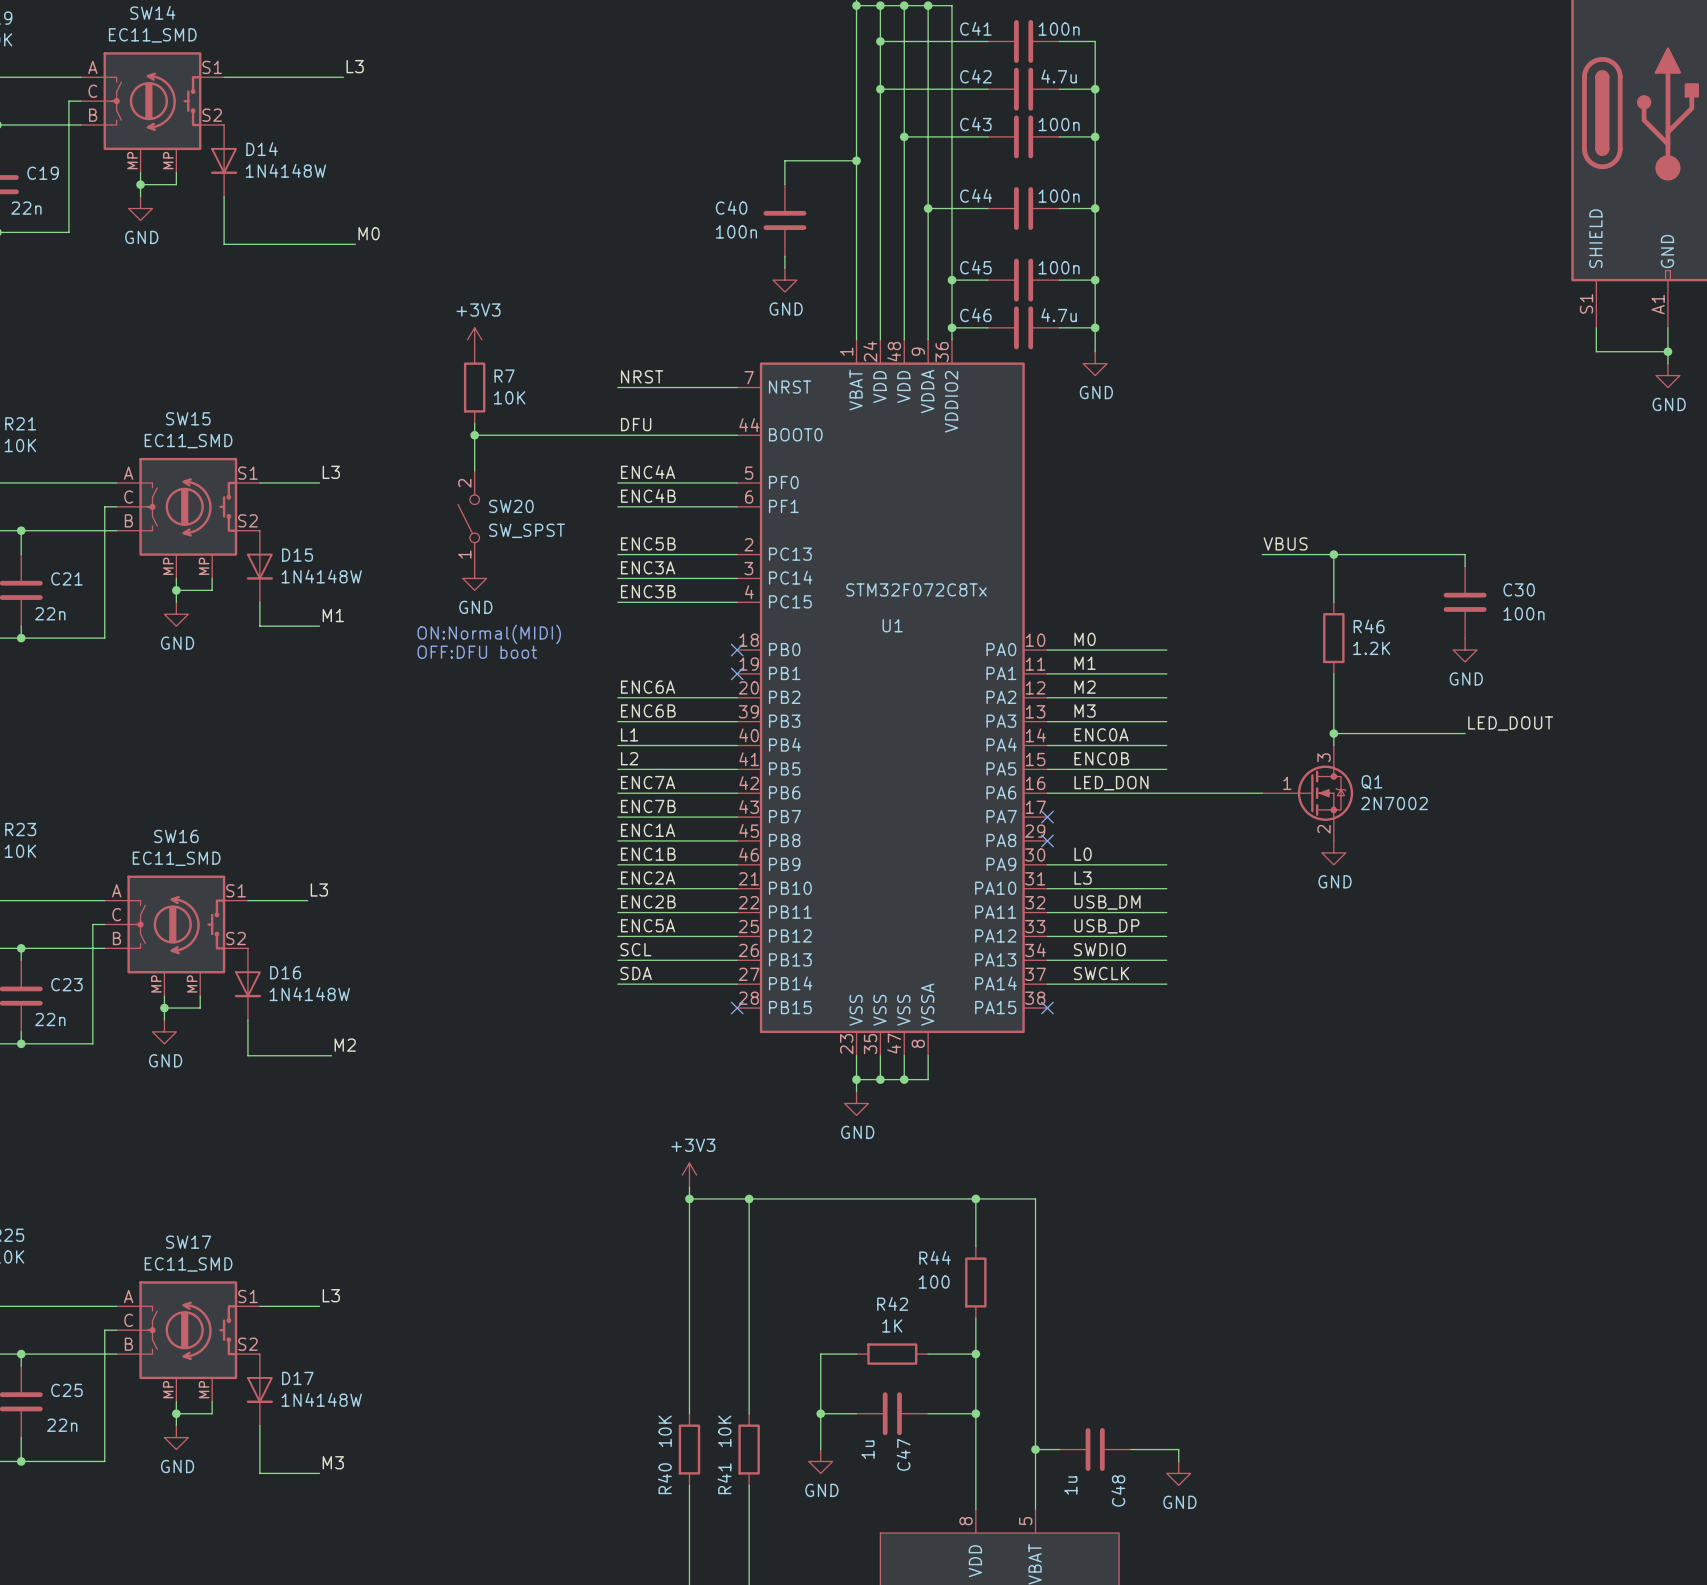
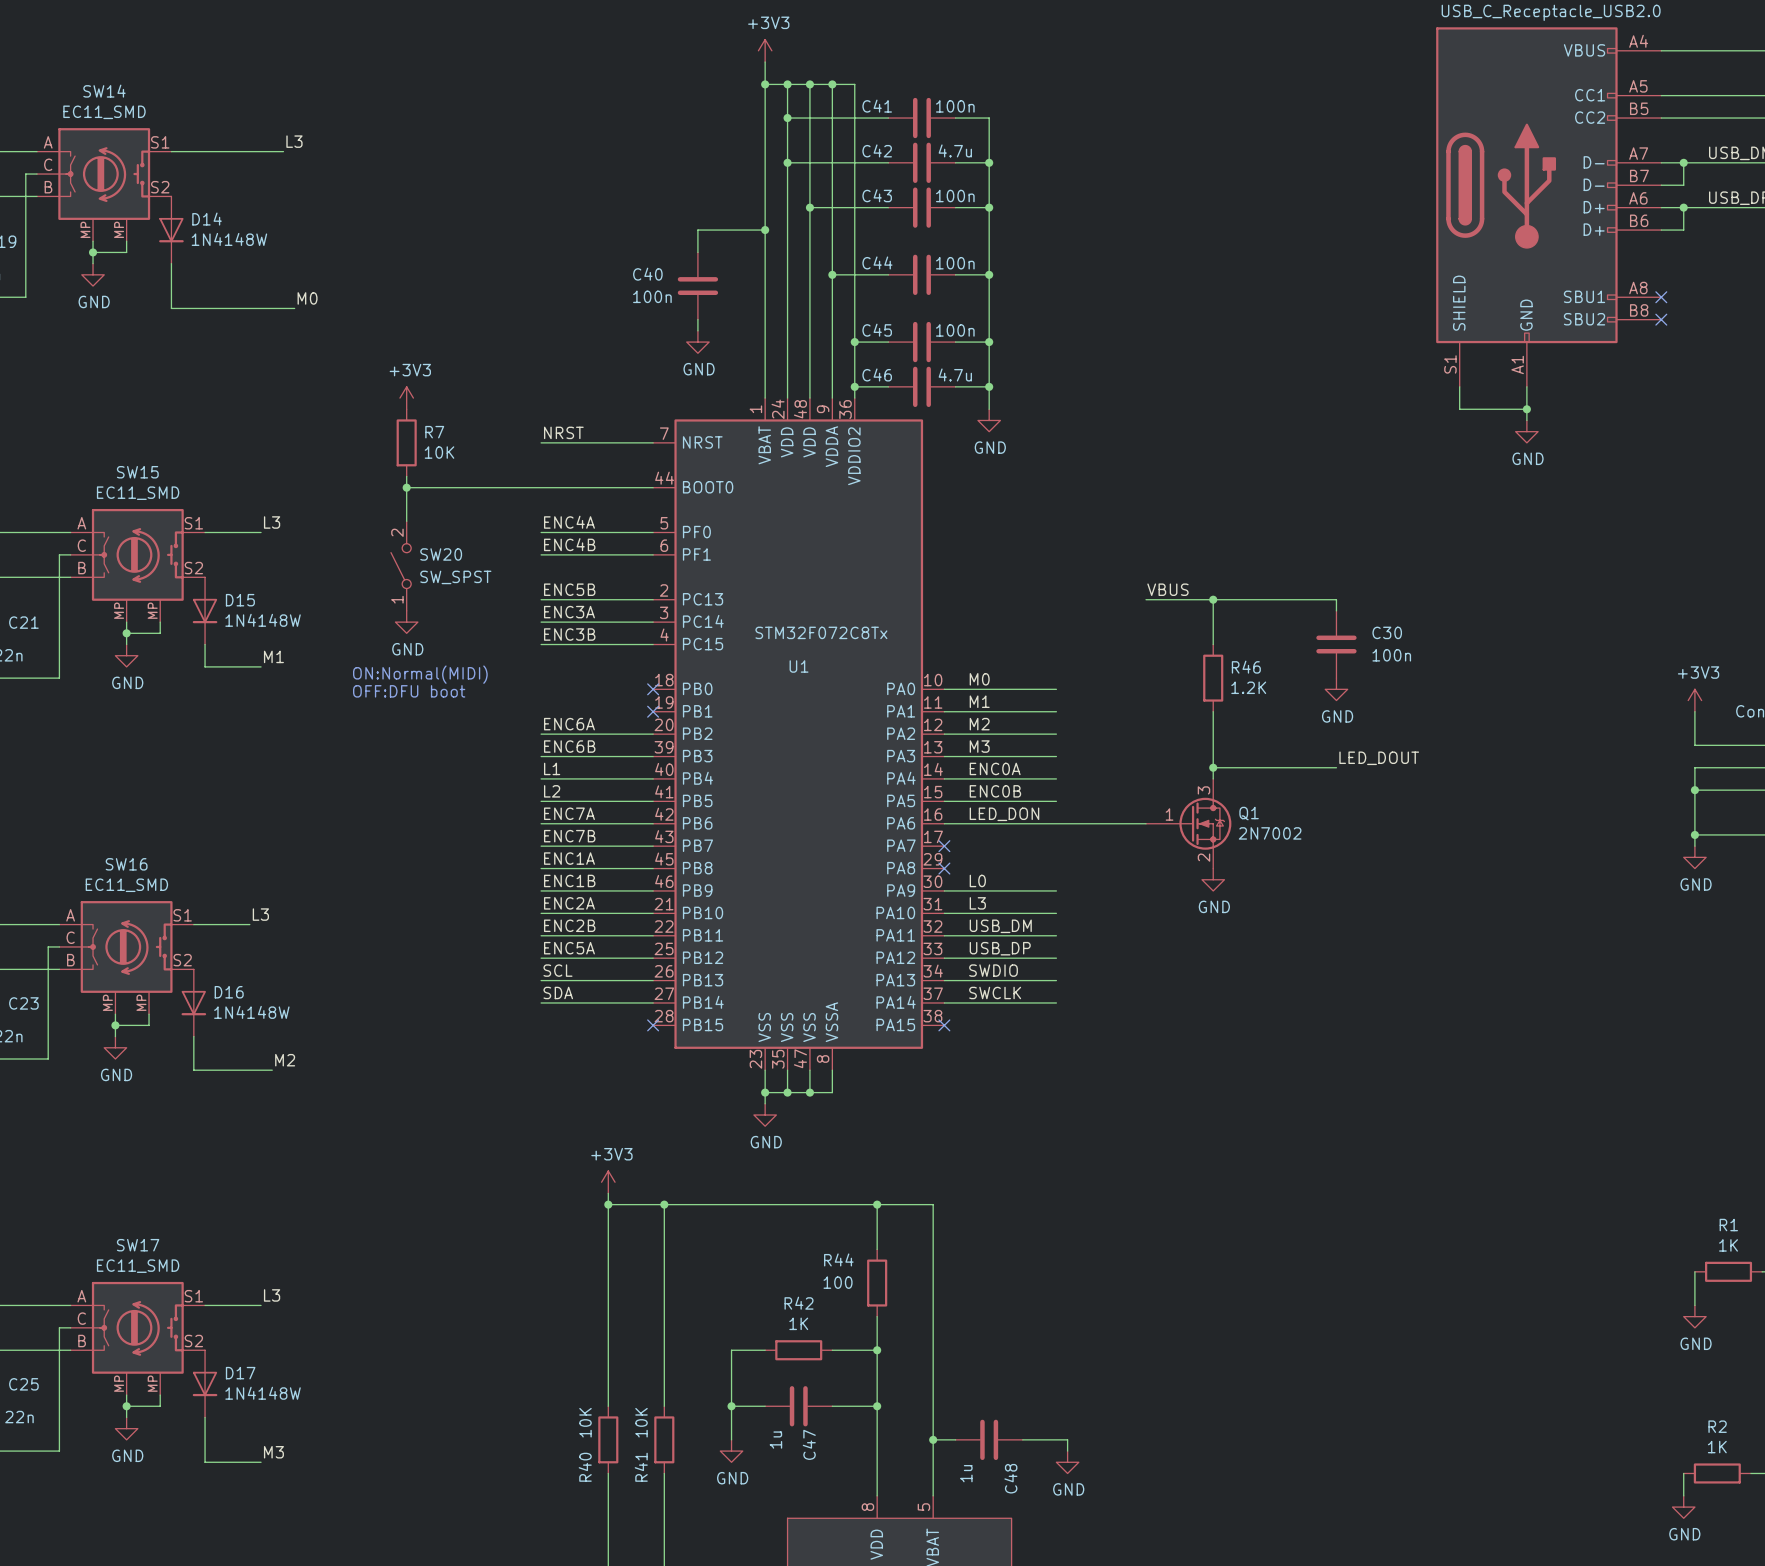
label: DFU (636, 424) -> none

